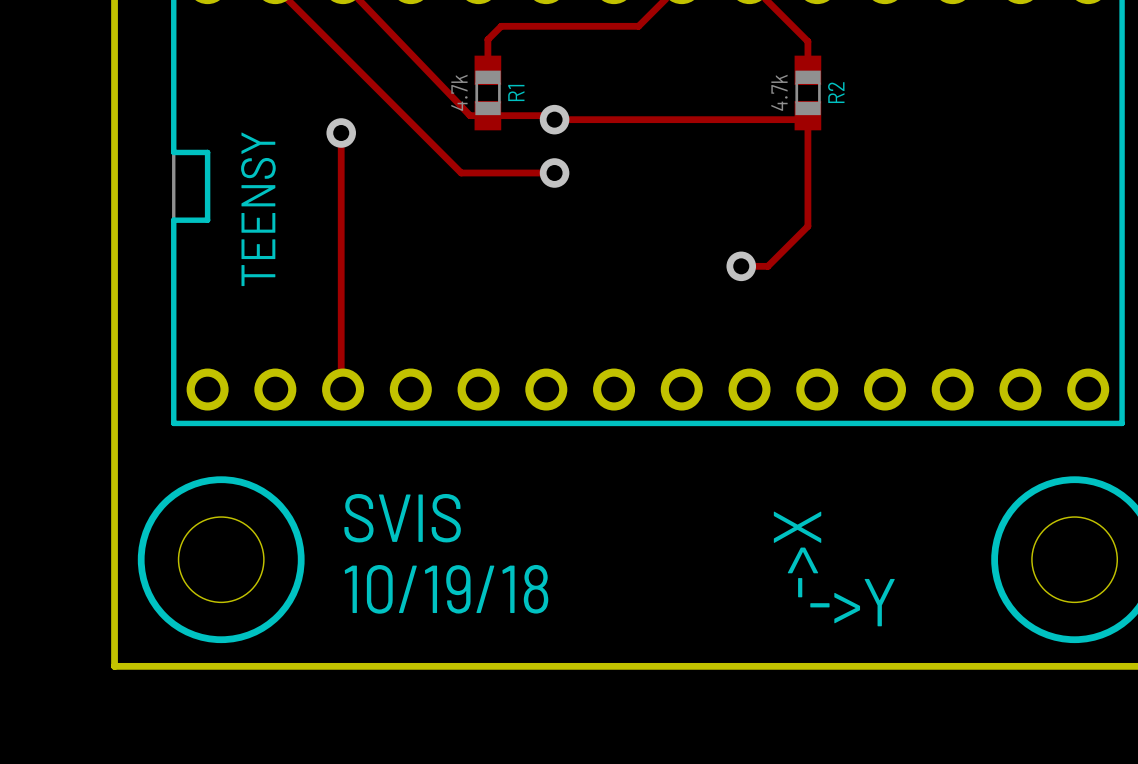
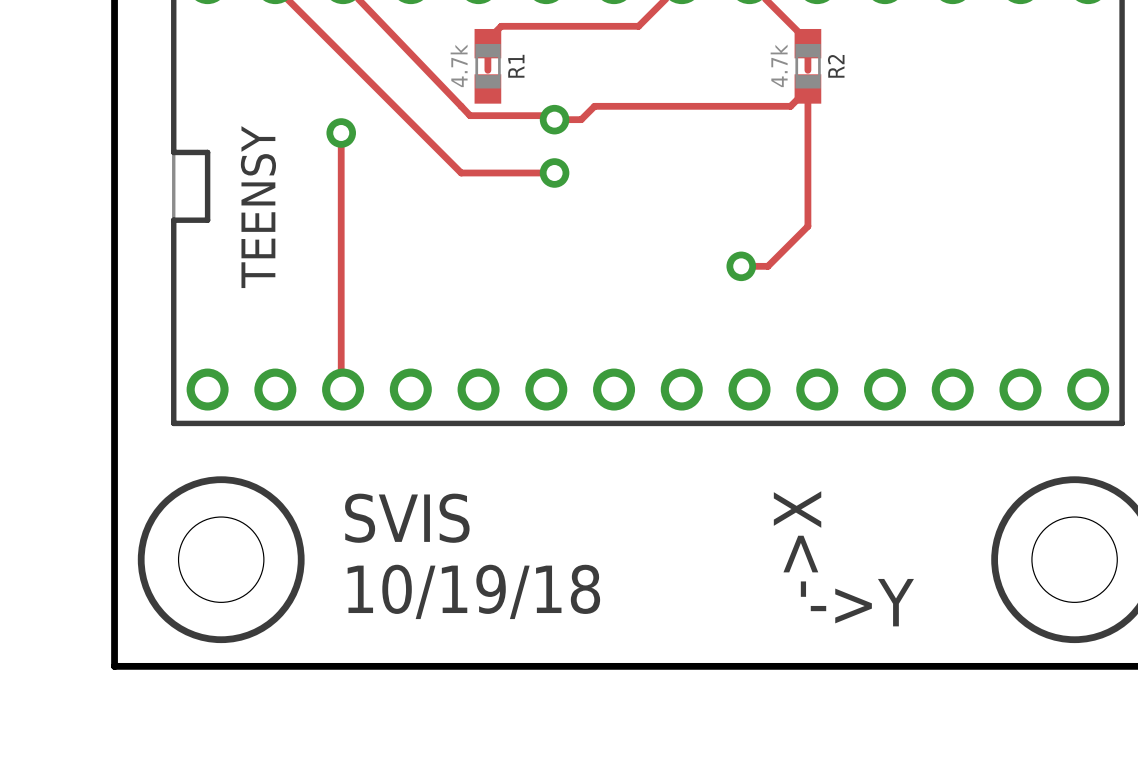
R1 position: (487, 92) -> (487, 66)
R2 position: (807, 92) -> (807, 66)
track: (581, 119) (807, 119) -> (581, 119) (594, 106) (790, 106) (807, 88) (807, 115)

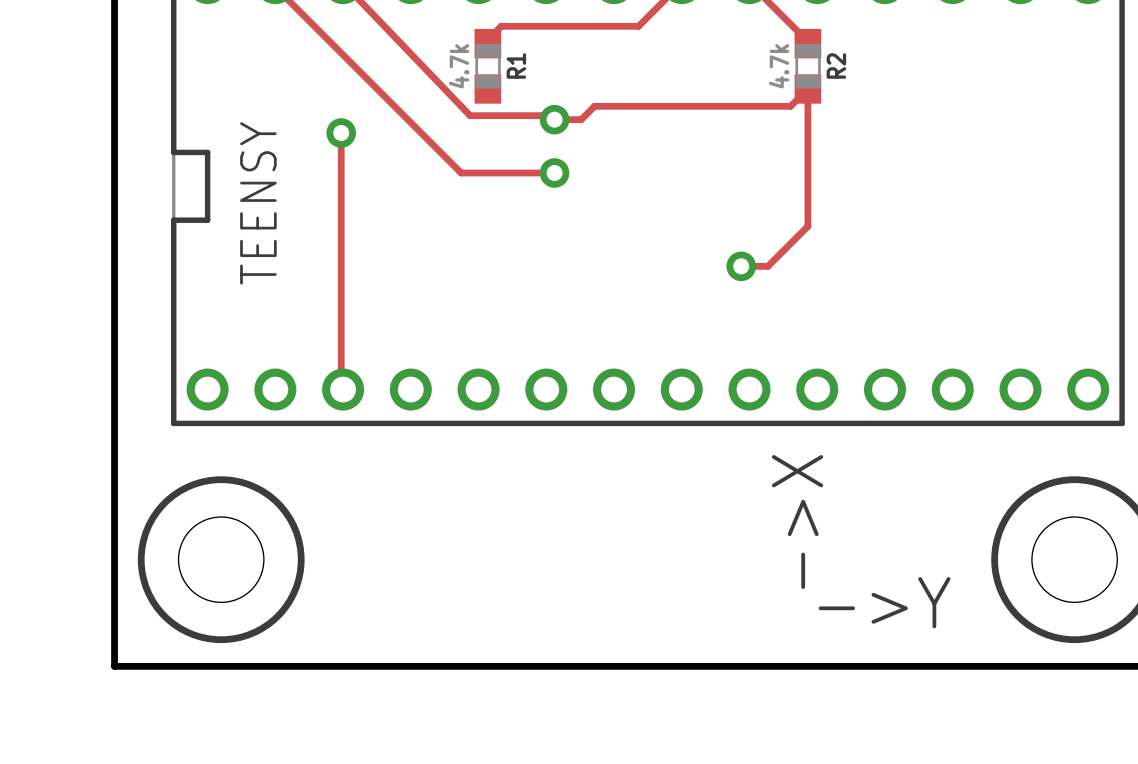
track: (487, 43) (487, 70) -> none
track: (807, 43) (807, 70) -> none
text: SVIS (407, 518) -> none
text: 10/19/18 (473, 591) -> none

